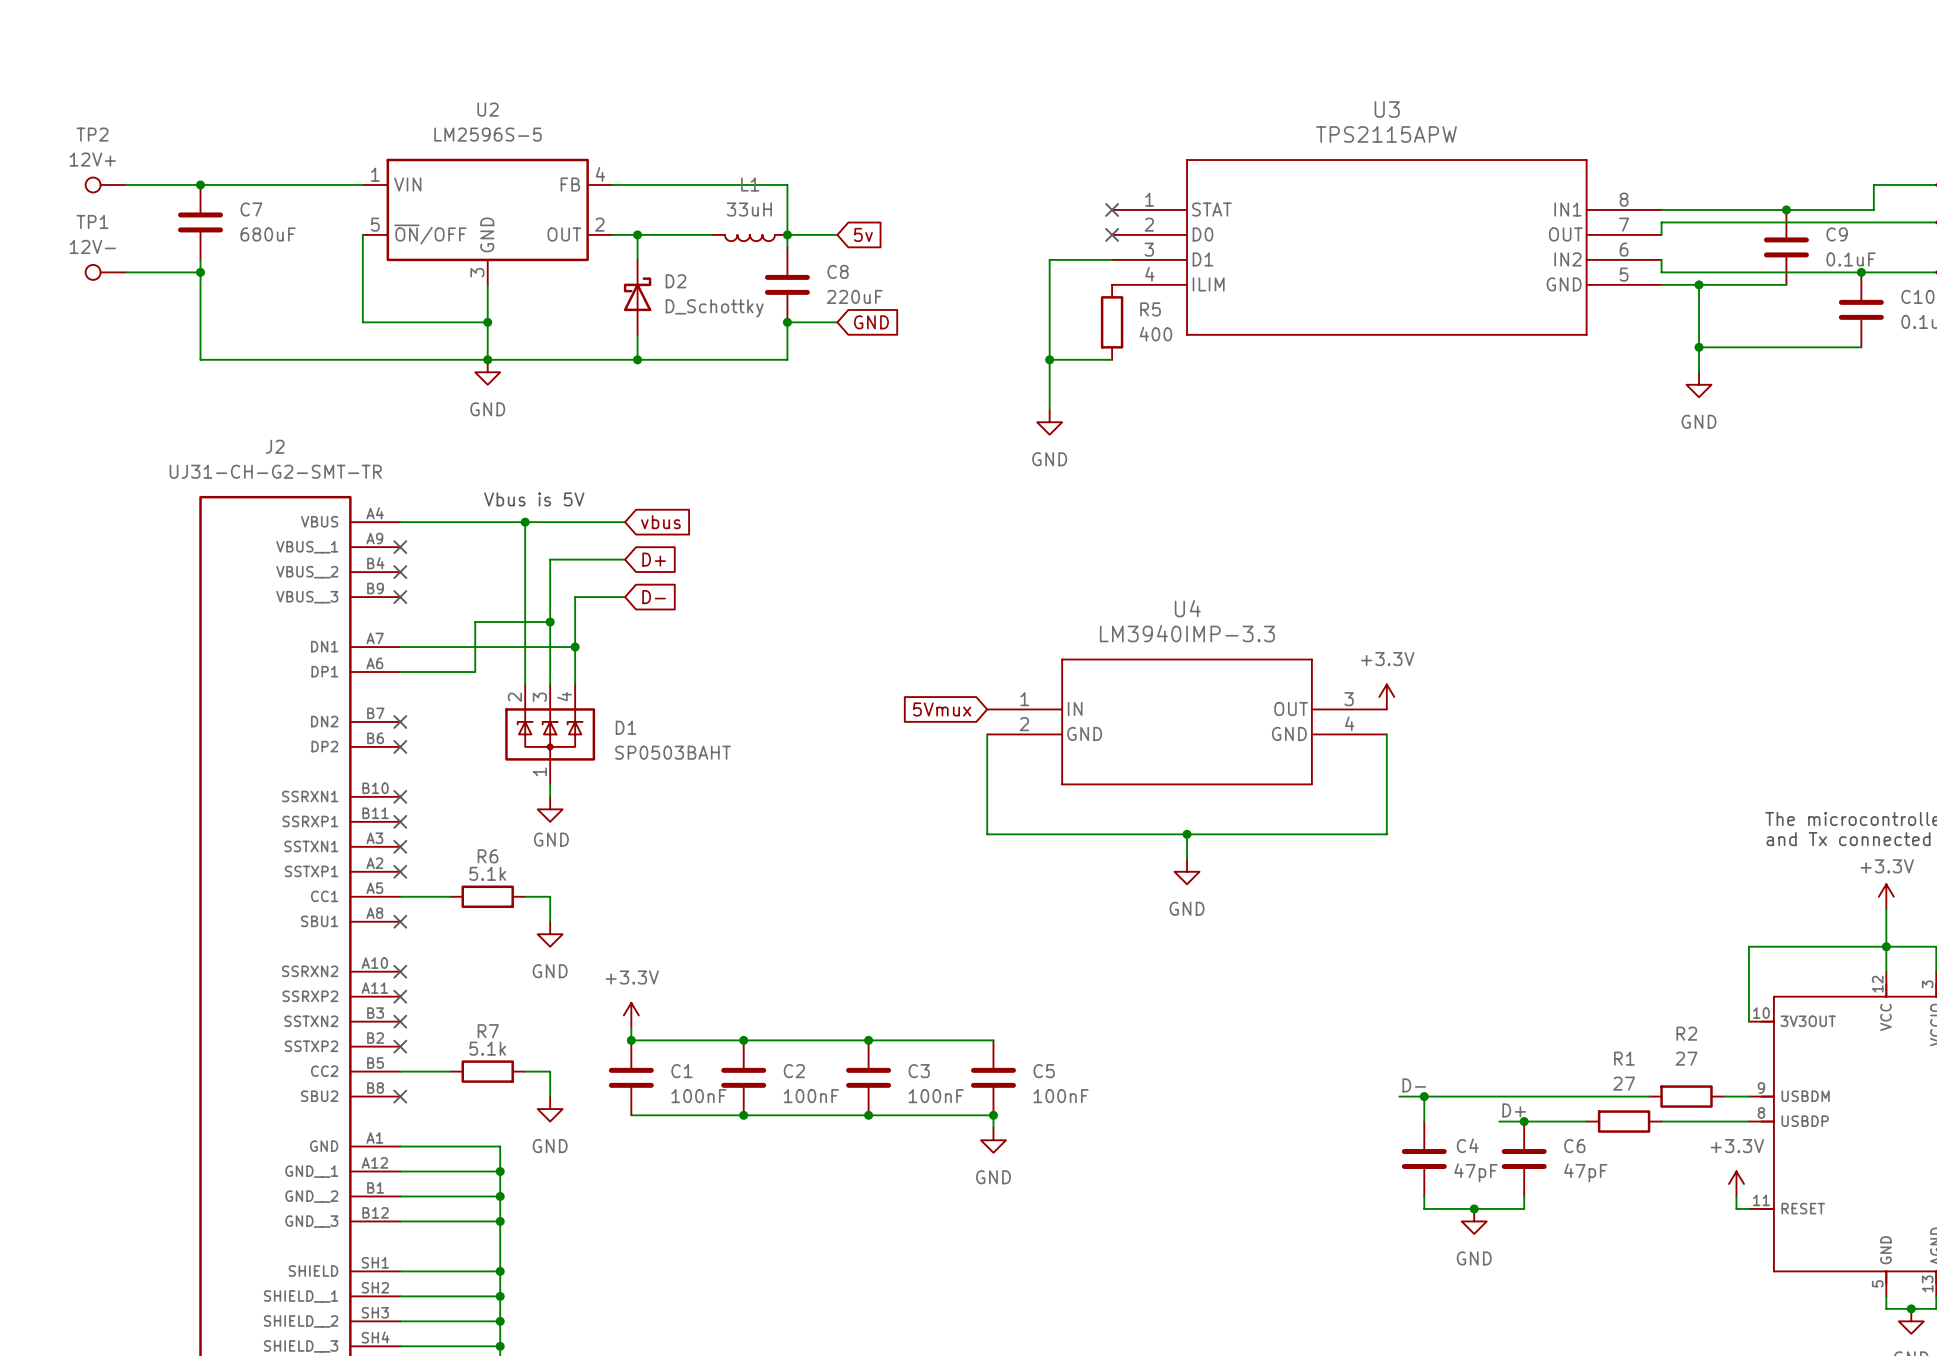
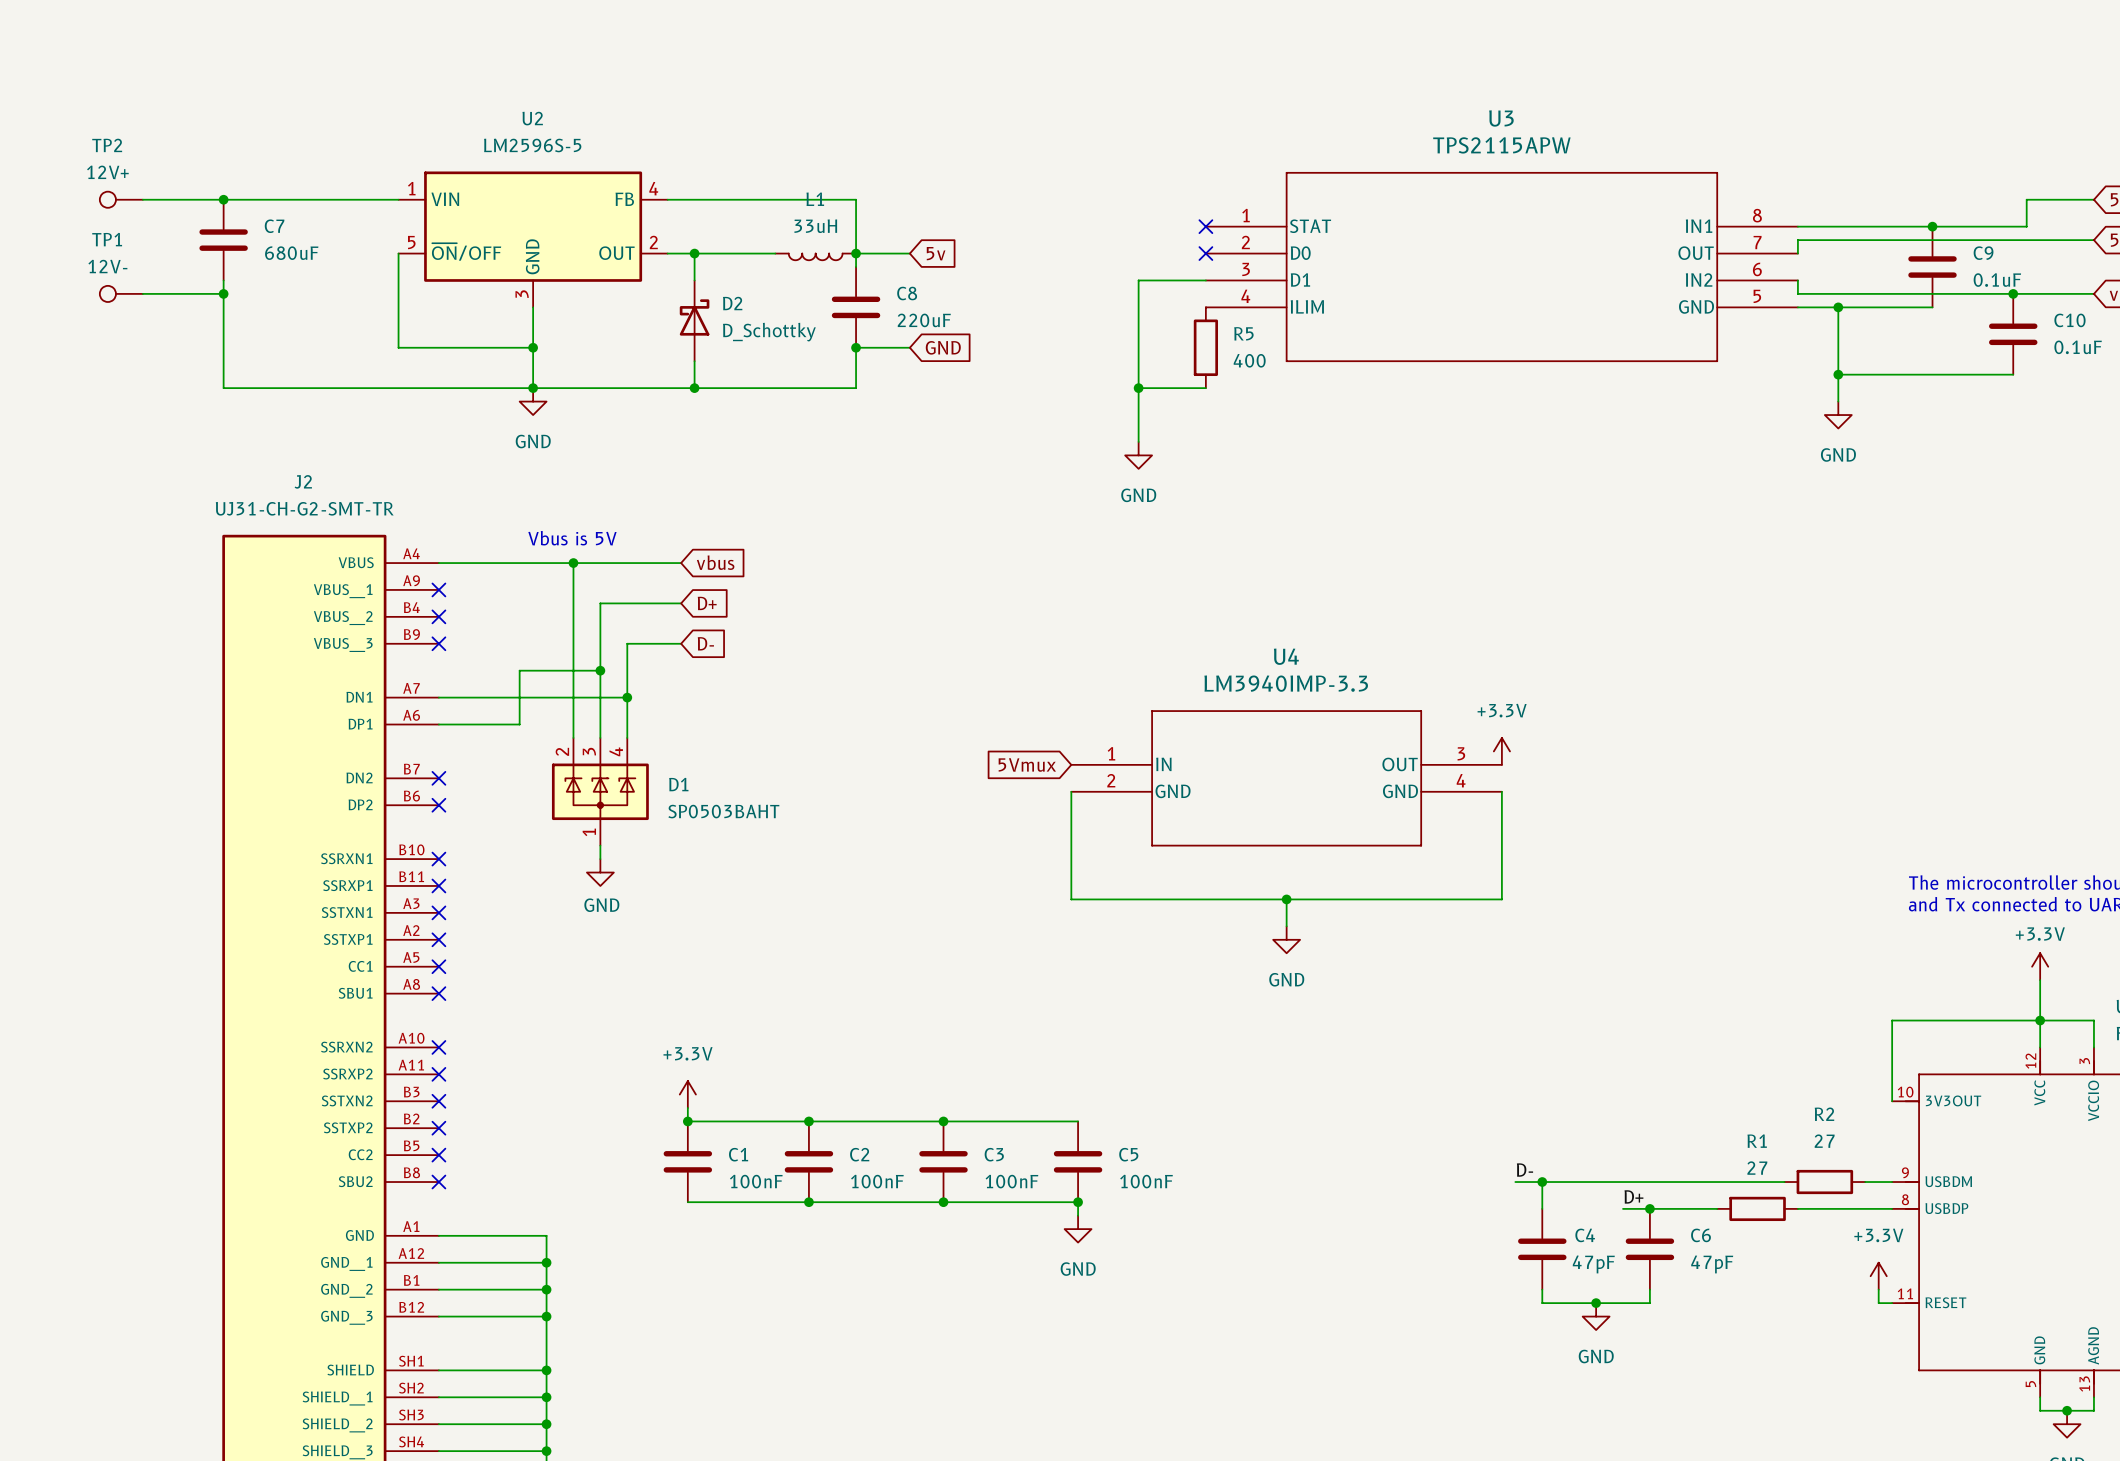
wire: (400, 896) (450, 896) -> none
no-connect mark: none -> (438, 966)
R6: 5.1k (487, 896) -> none
wire: (525, 896) (550, 896) (550, 921) -> none
power symbol: GND (550, 934) -> none
wire: (400, 1071) (450, 1071) -> none
no-connect mark: none -> (438, 1155)
R7: 5.1k (487, 1071) -> none
wire: (525, 1071) (550, 1071) (550, 1096) -> none
power symbol: GND (550, 1109) -> none

